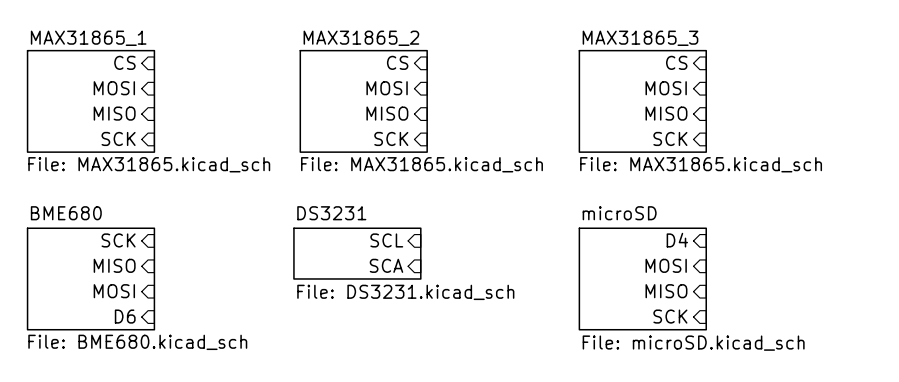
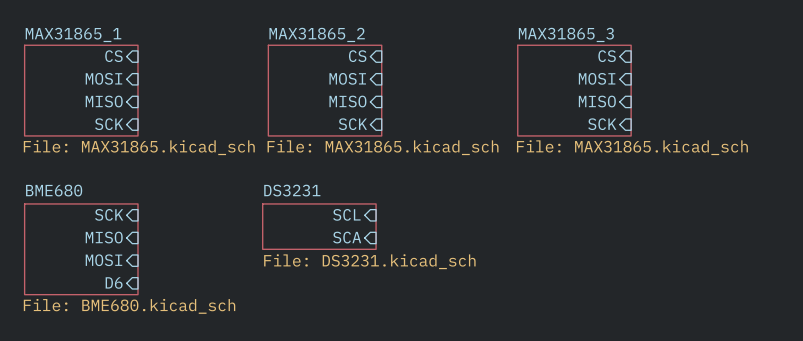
sheet pin: D4 (677, 240) -> none
sheet pin: MOSI (666, 265) -> none
sheet microSD: File: microSD.kicad_sch (642, 278) -> none
sheet pin: MISO (666, 291) -> none
sheet pin: SCK (670, 316) -> none

